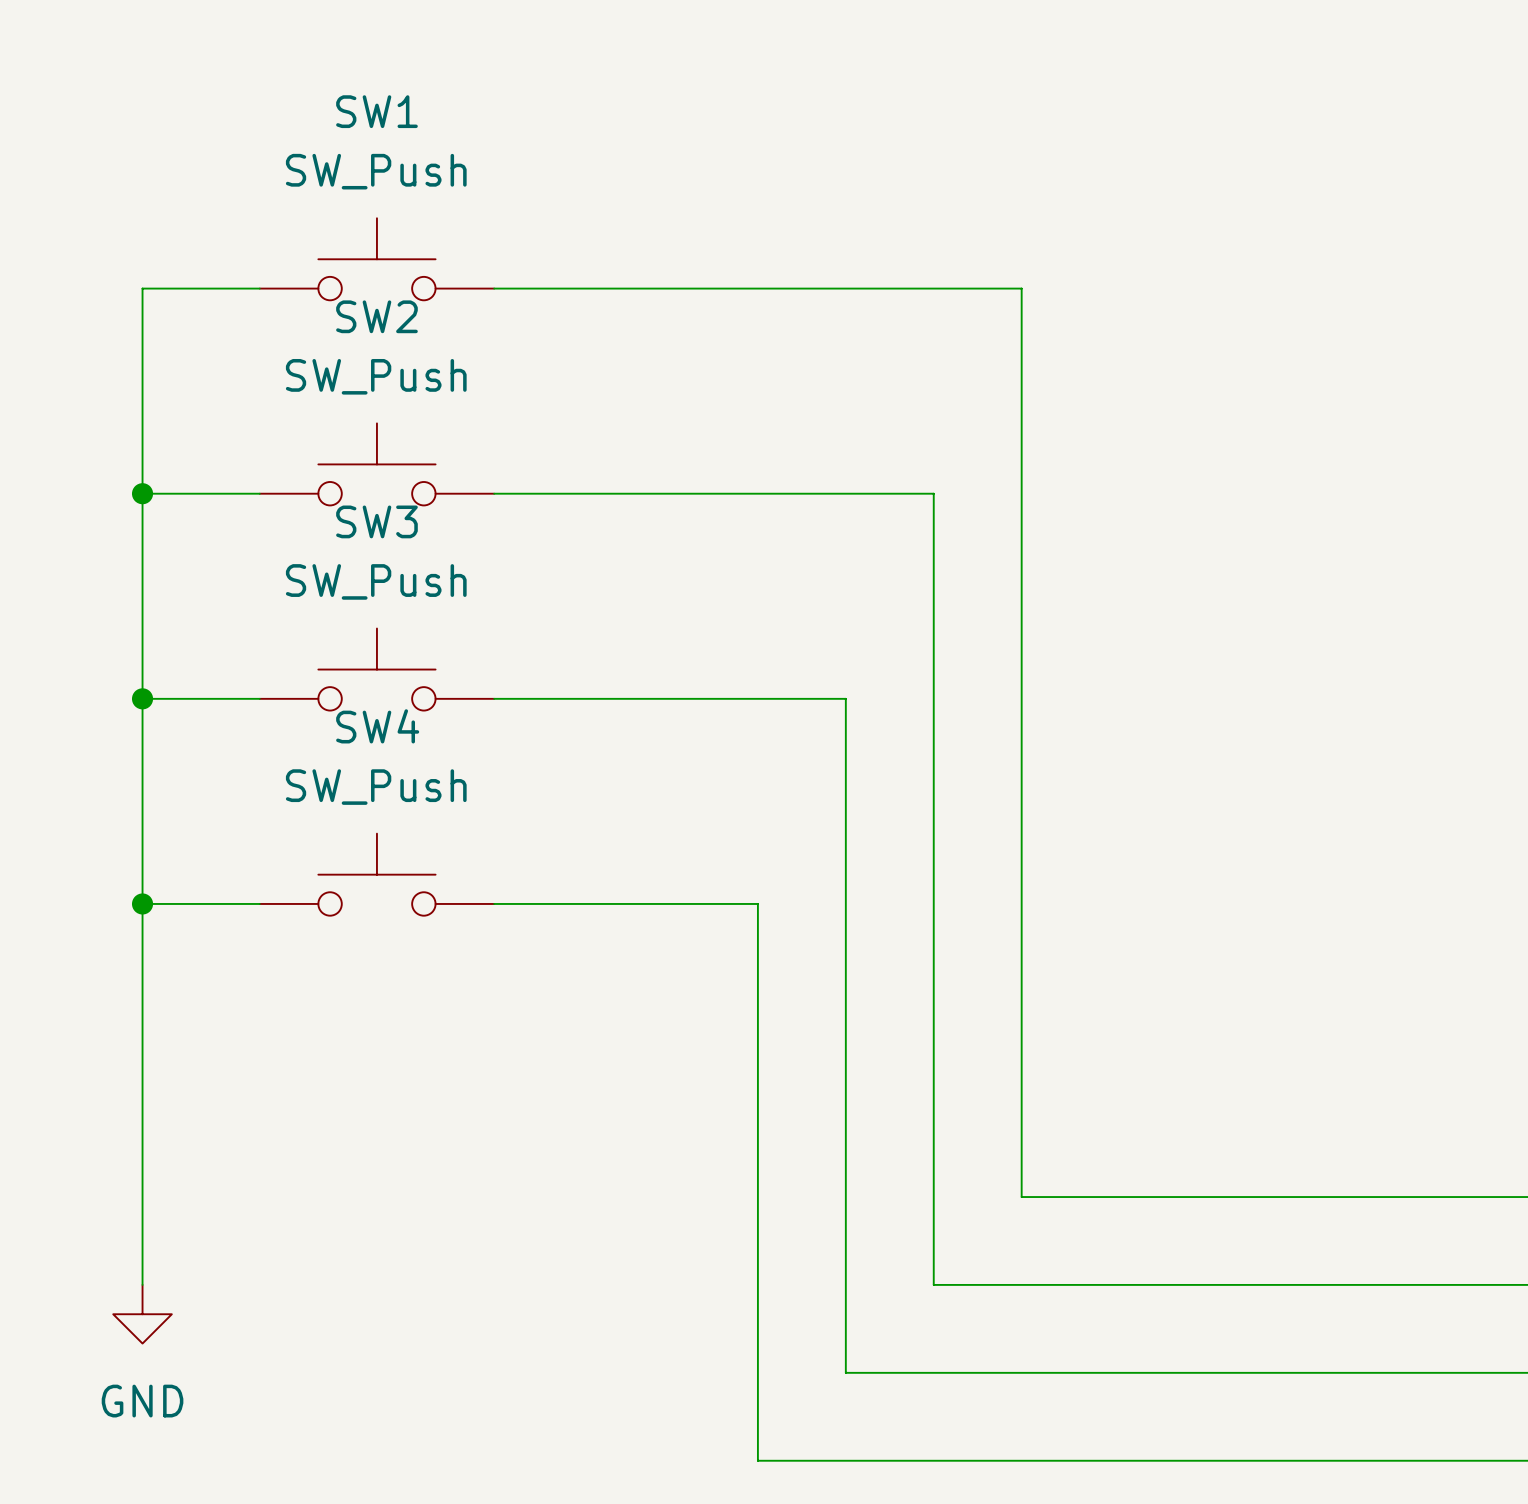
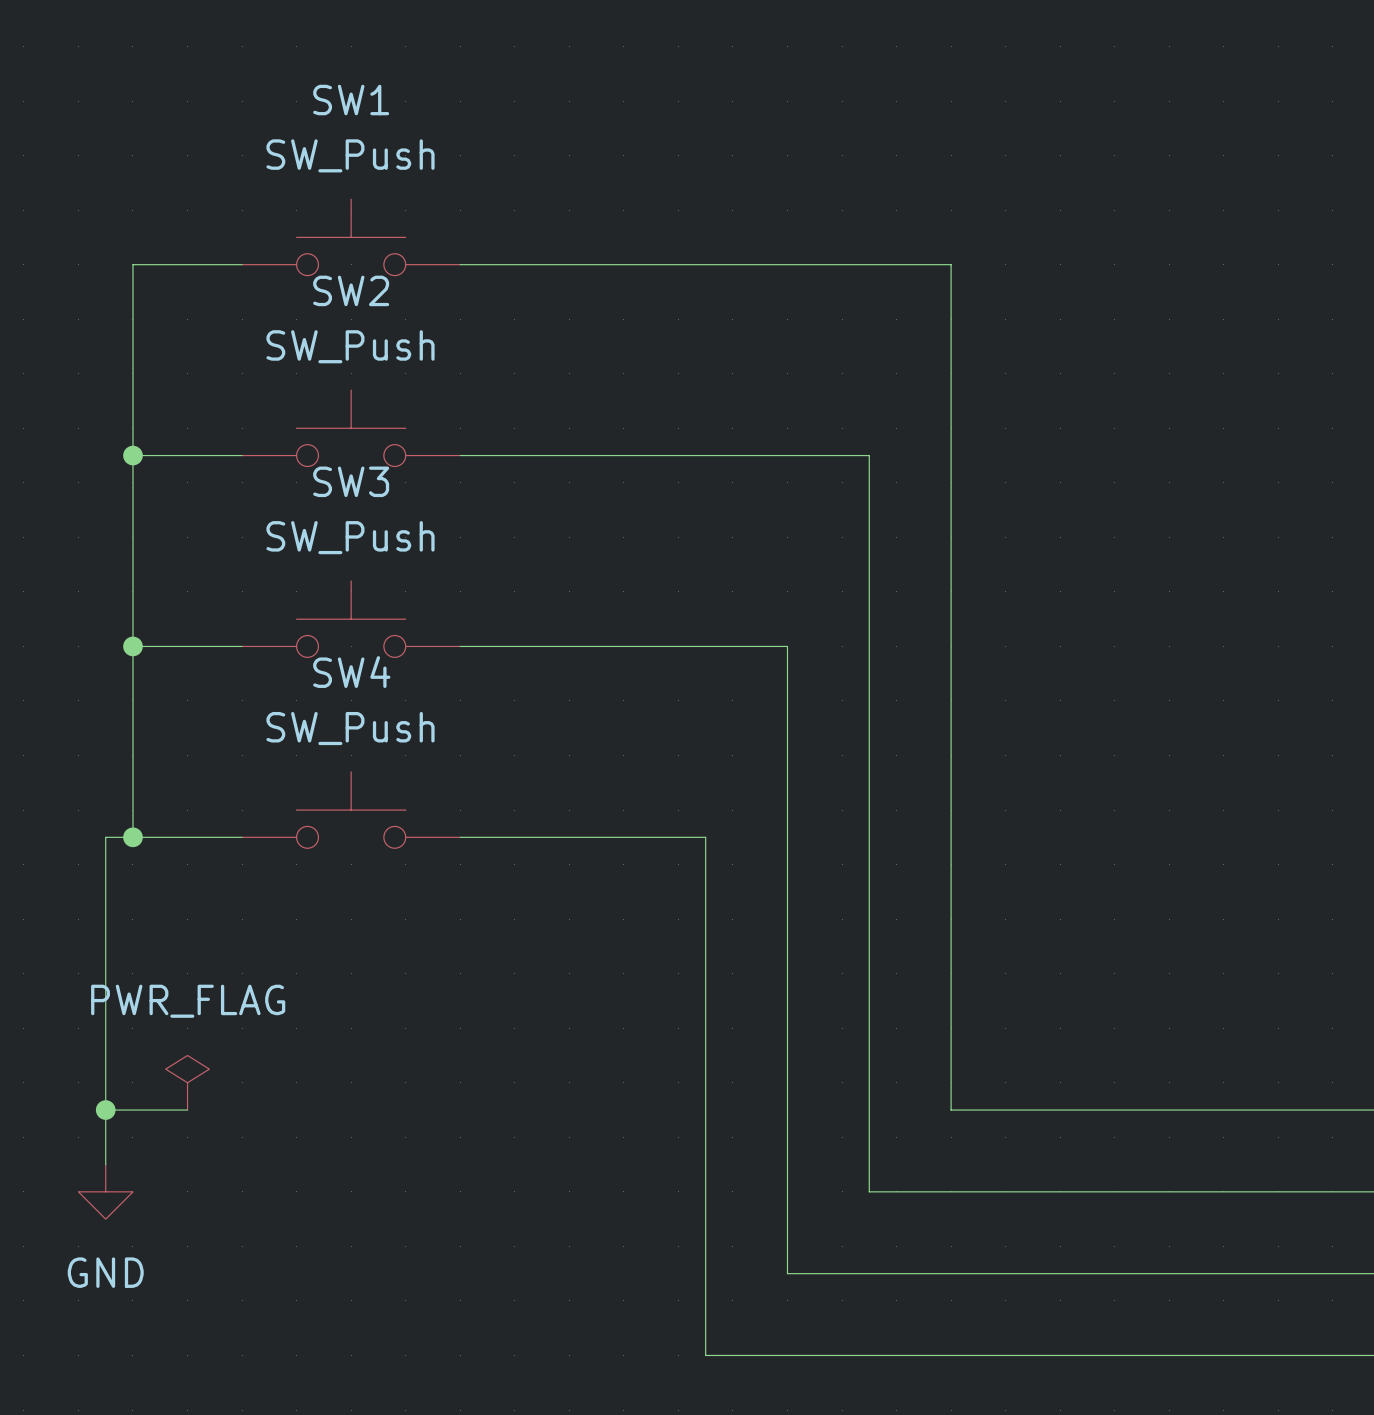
wire: (142, 903) (142, 1284) -> (132, 837) (105, 837) (105, 1164)
power symbol: none -> PWR_FLAG (187, 1082)
wire: none -> (105, 1110) (187, 1110)
junction: none -> (105, 1110)
power symbol position: GND (142, 1314) -> GND (105, 1191)

